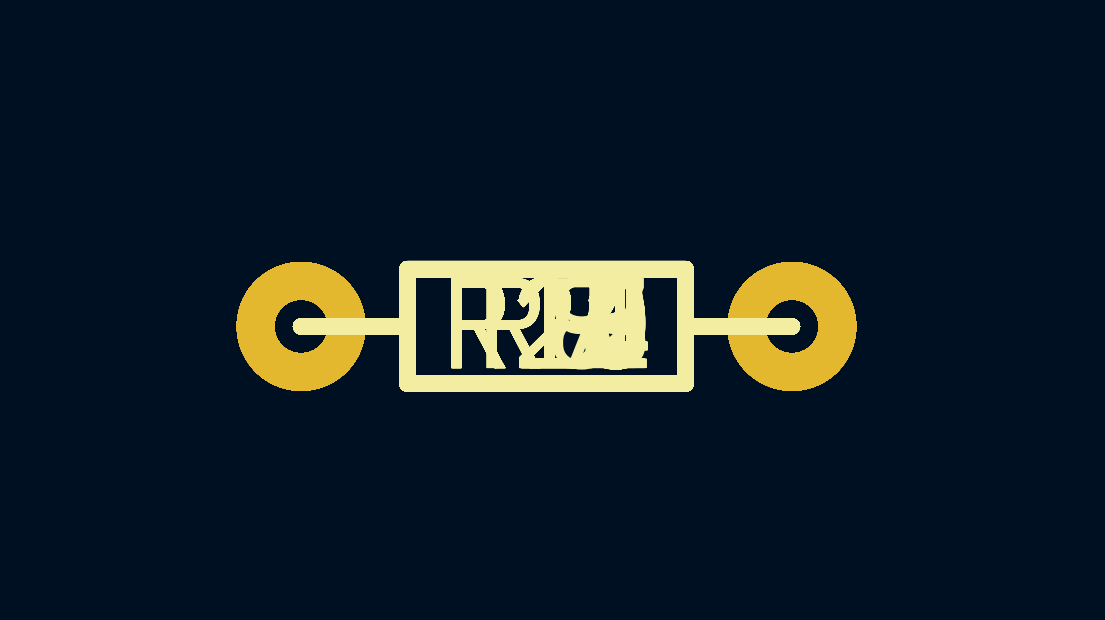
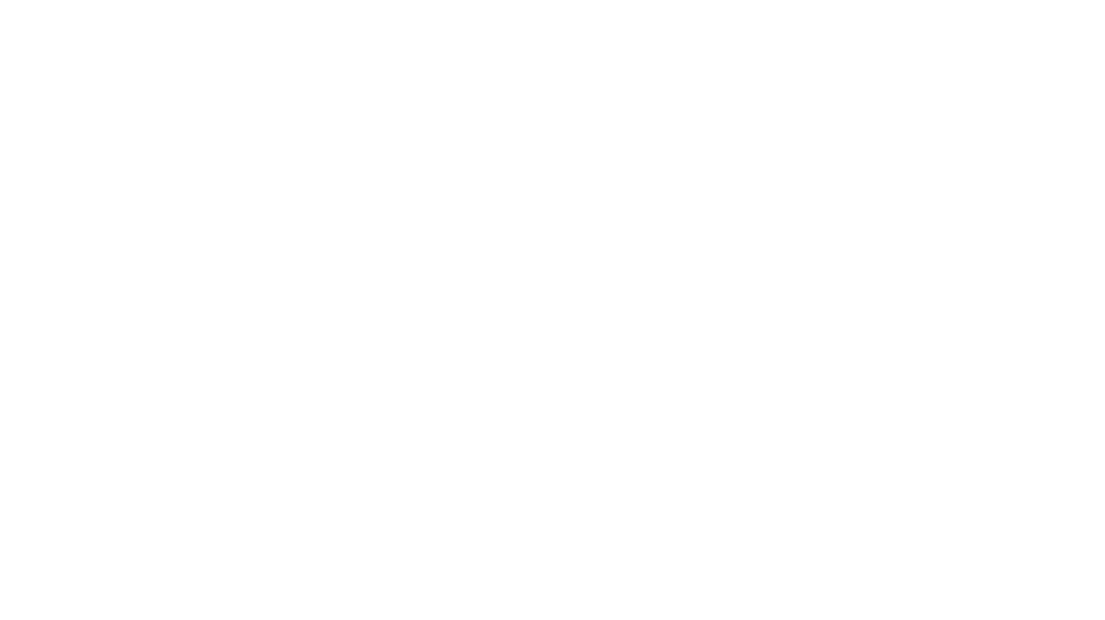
part: (546, 326) -> none
part: (546, 326) -> none
part: (546, 326) -> none
part: (546, 326) -> none
part: (546, 326) -> none
part: (546, 326) -> none
part: (546, 326) -> none
part: (546, 326) -> none
part: (546, 326) -> none
part: (546, 326) -> none
part: (546, 326) -> none
part: (546, 326) -> none
part: (546, 326) -> none
part: (546, 326) -> none
part: (546, 326) -> none
part: (546, 326) -> none
part: (546, 326) -> none
part: (546, 326) -> none
part: (546, 326) -> none

